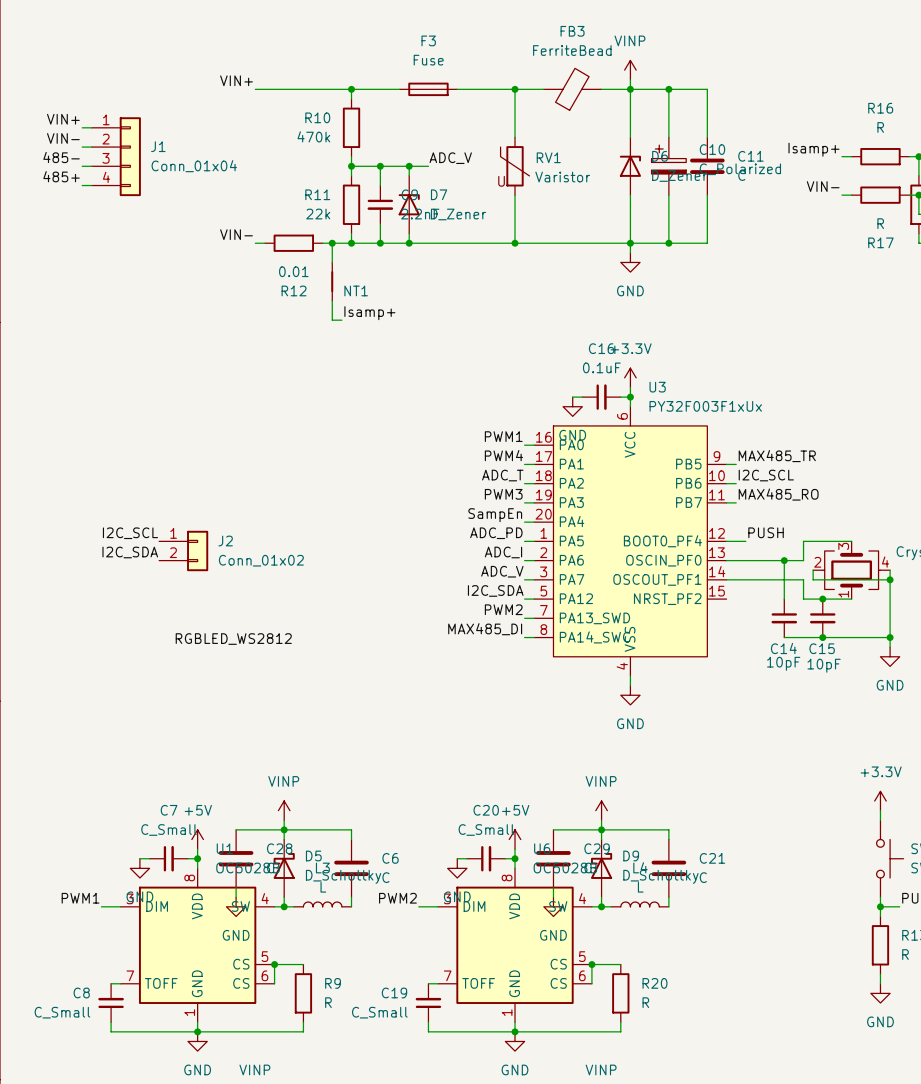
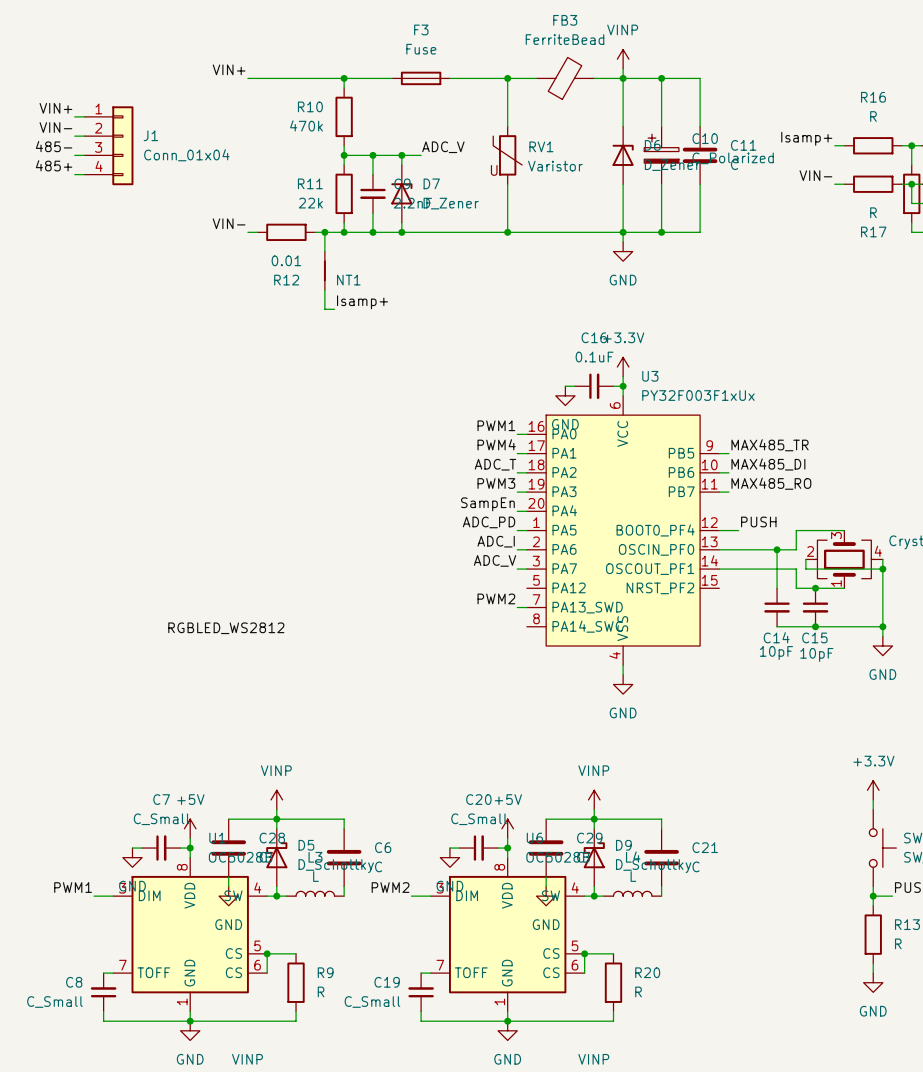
label: I2C_SCL (766, 475) -> MAX485_DI (768, 464)
label: I2C_SCL (130, 533) -> none
J2: Conn_01x02 (183, 550) -> none
label: I2C_SDA (130, 552) -> none
label: I2C_SDA (495, 590) -> none
wire: (524, 599) (534, 599) -> none
label: MAX485_DI (485, 629) -> none
wire: (524, 637) (534, 637) -> none

